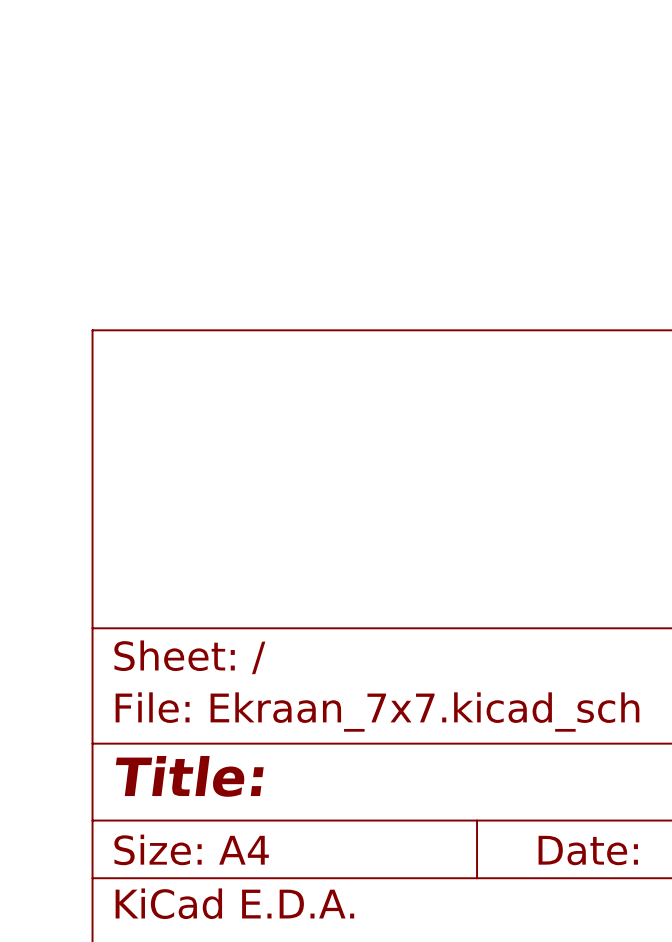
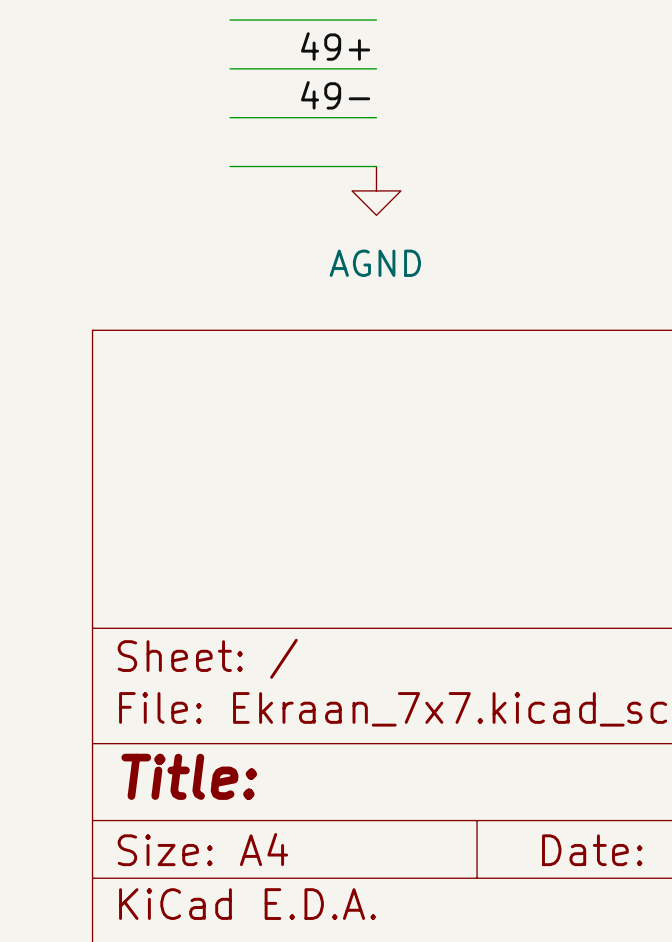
wire: none -> (229, 20) (376, 20)
label: none -> 49+ (335, 46)
wire: none -> (229, 68) (376, 68)
label: none -> 49- (335, 95)
wire: none -> (229, 117) (376, 117)
wire: none -> (229, 166) (376, 166)
power symbol: none -> AGND (376, 190)

